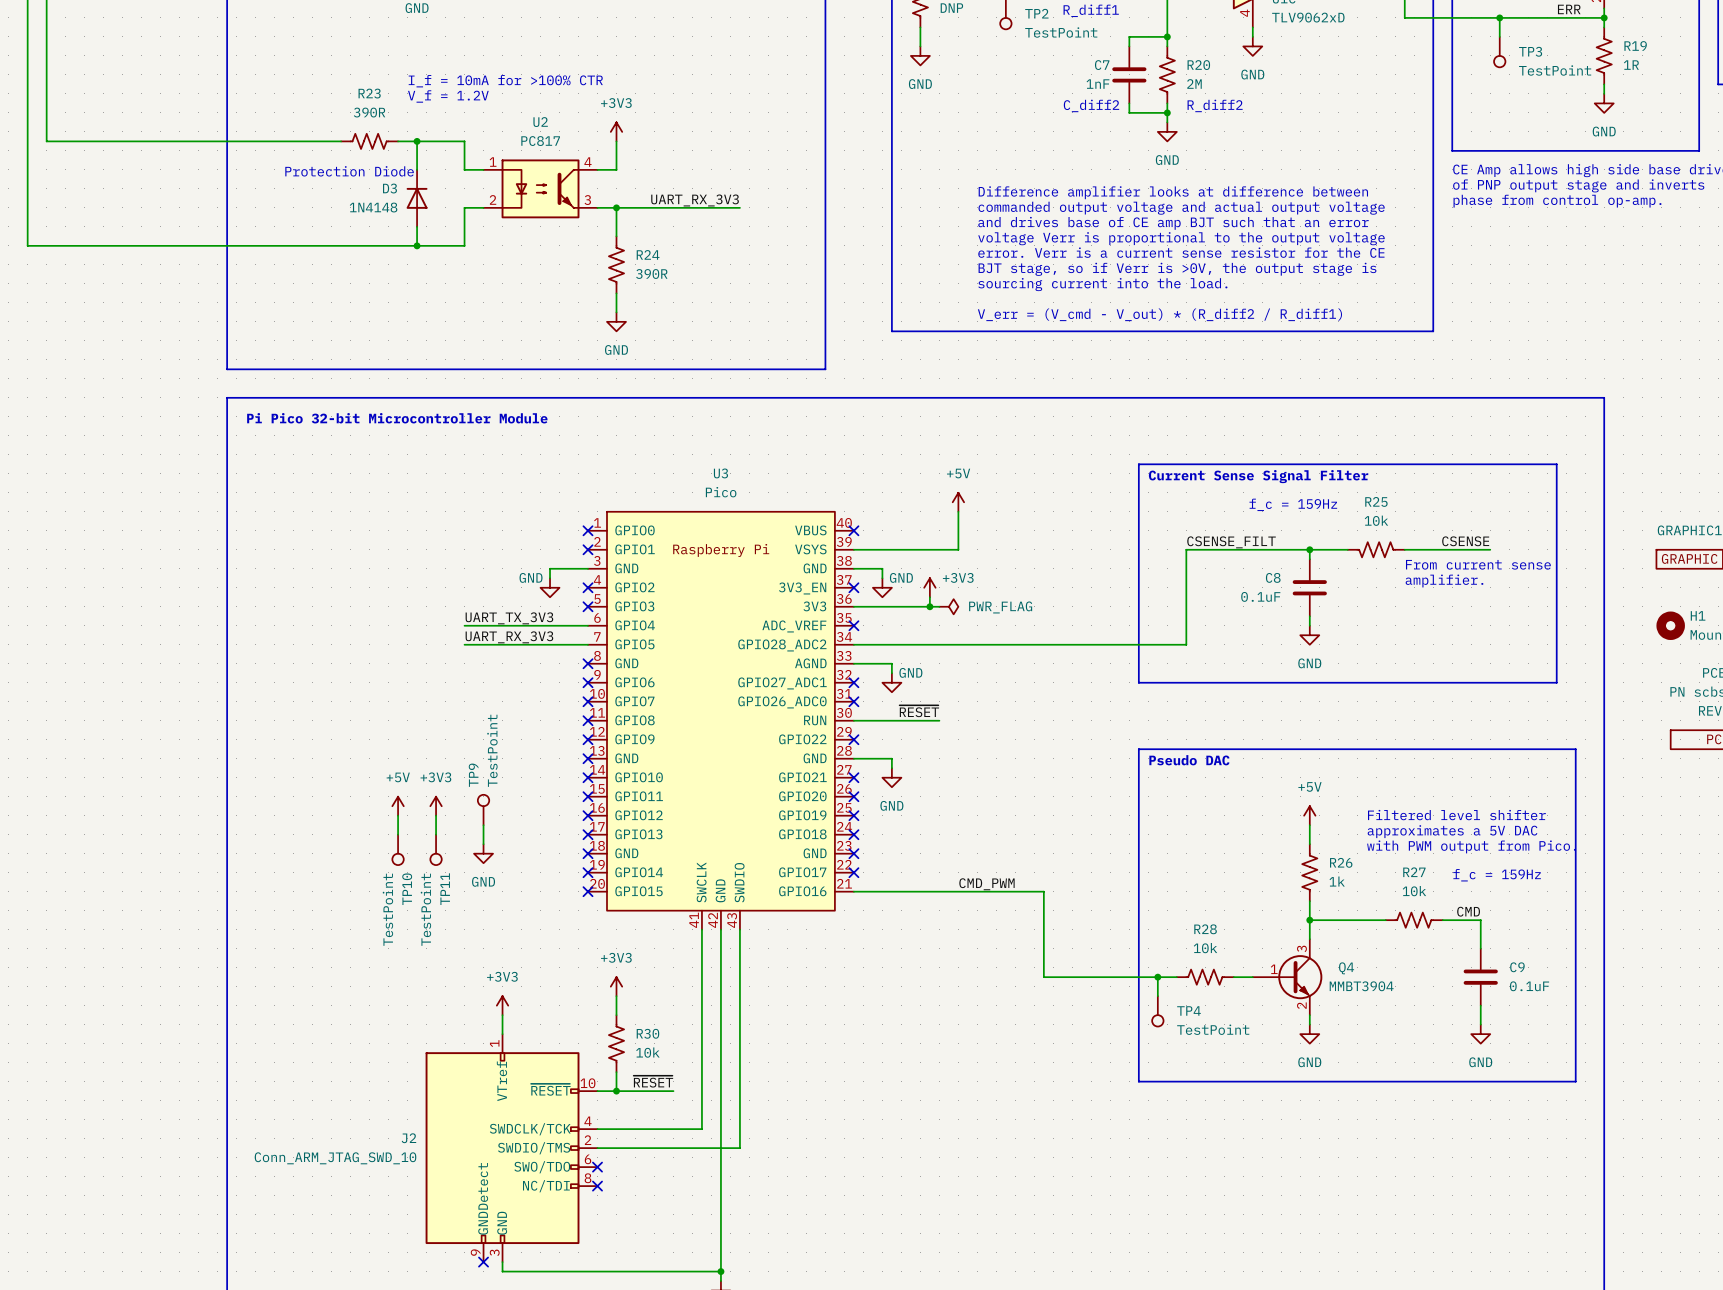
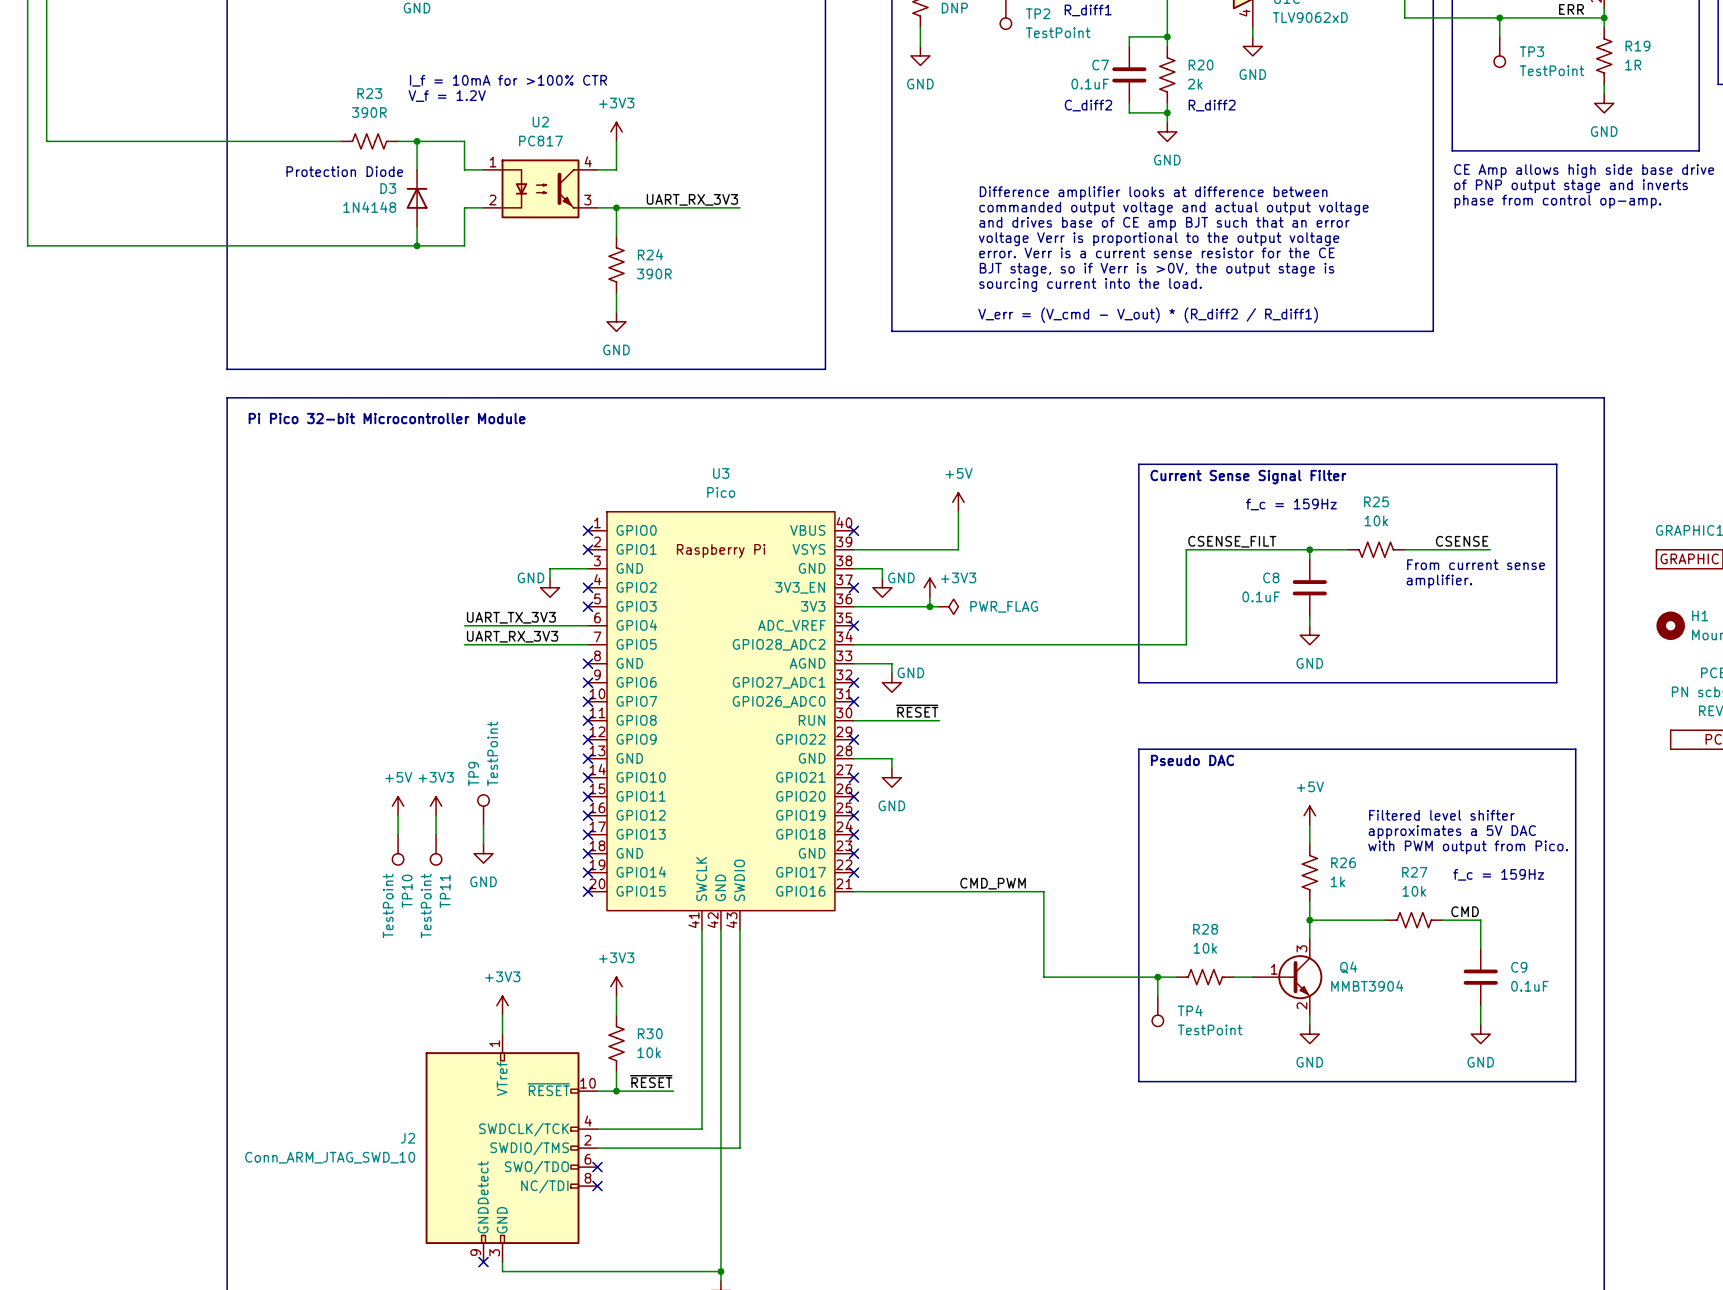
R20 value: 2M (1194, 83) -> 2k (1195, 84)
C7 value: 1nF (1097, 84) -> 0.1uF (1090, 84)

